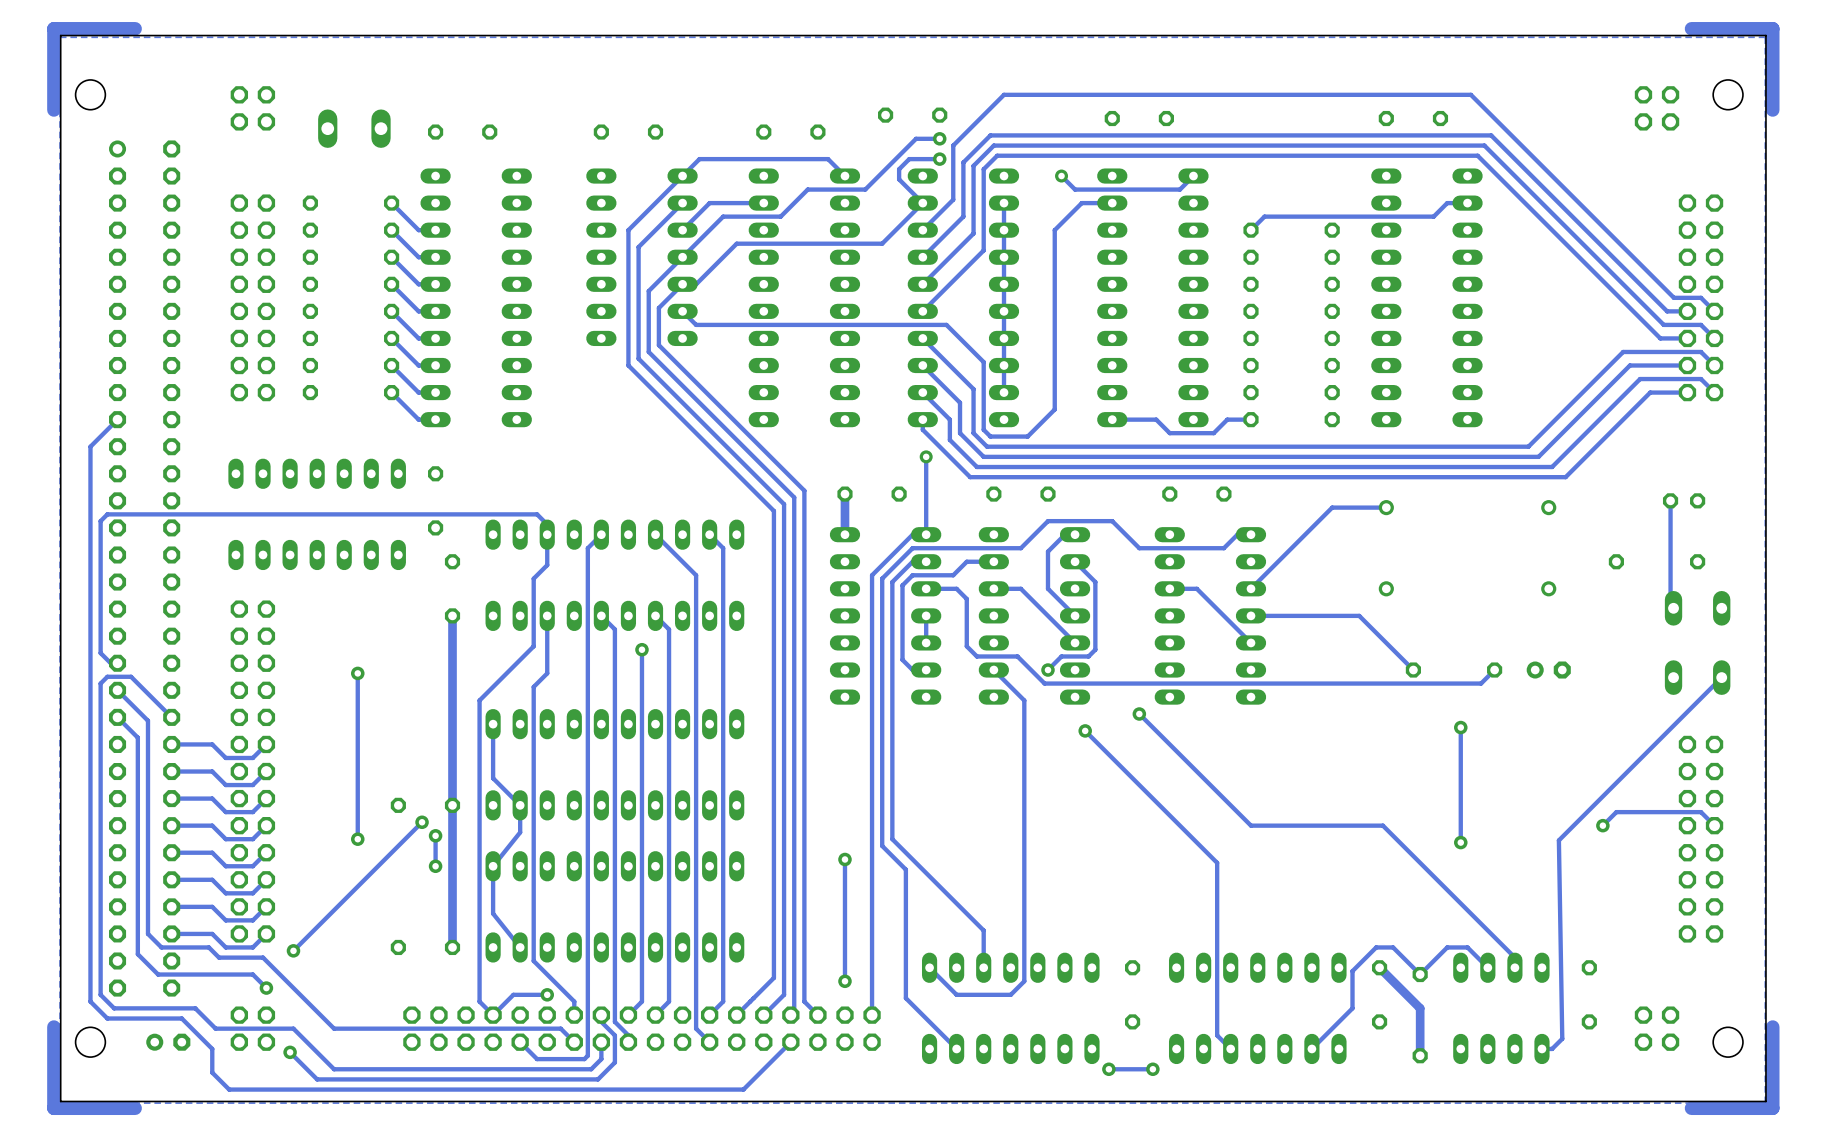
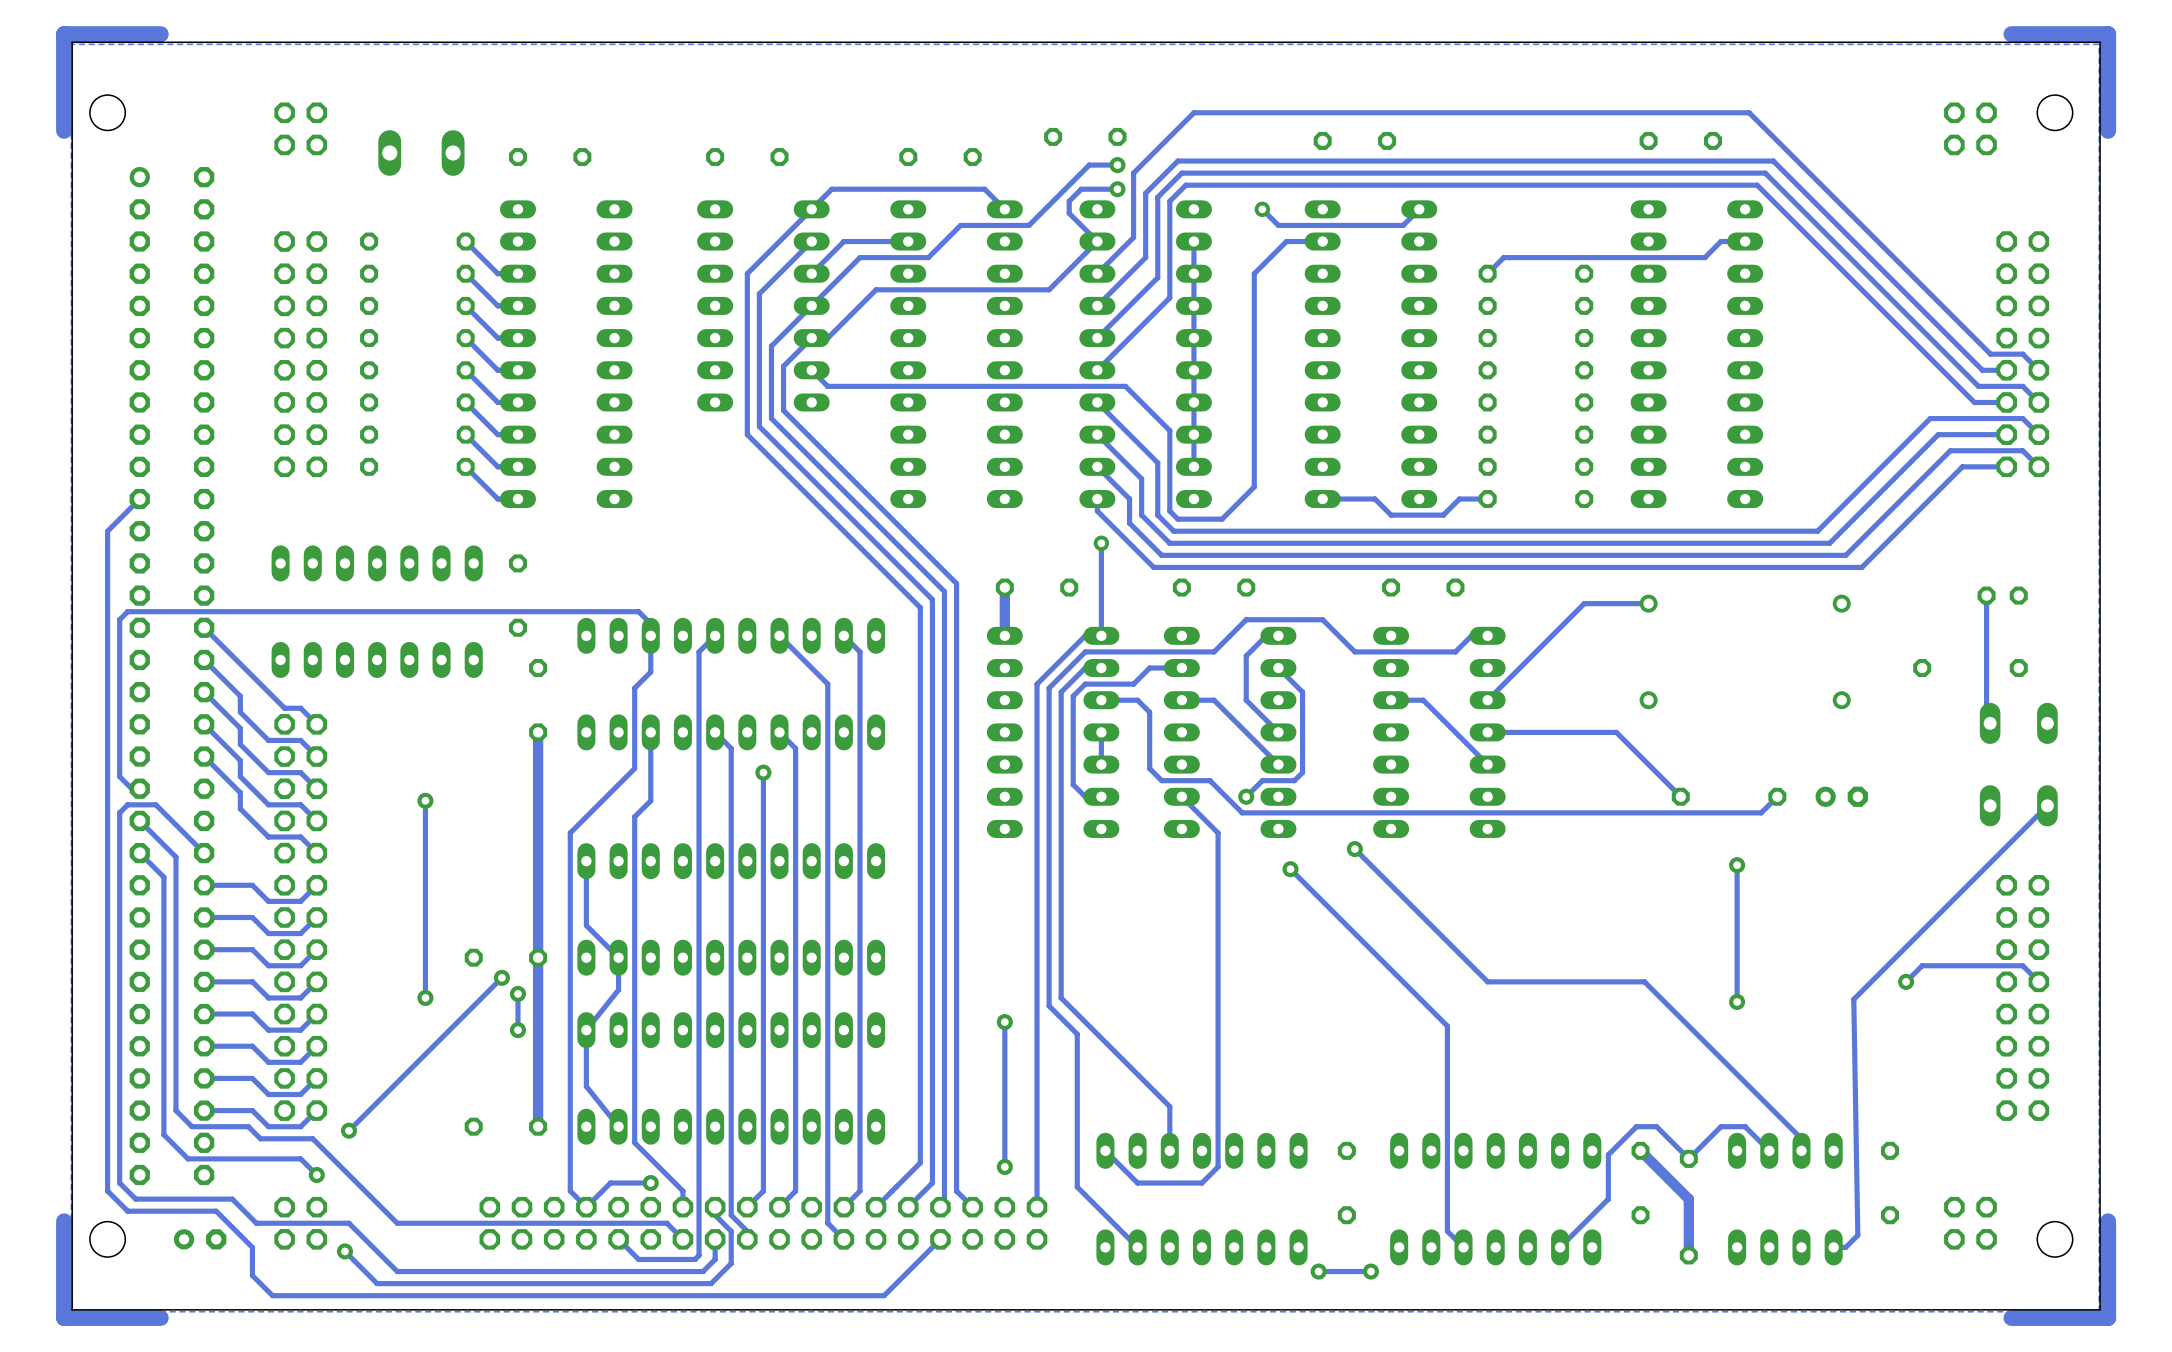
track: none -> (204, 627) (284, 708) (300, 708) (316, 724)
track: none -> (204, 659) (240, 696) (240, 712) (268, 740) (300, 740) (316, 756)
track: none -> (204, 692) (240, 728) (240, 744) (268, 772) (300, 772) (316, 788)
track: none -> (204, 724) (240, 760) (240, 776) (268, 804) (300, 804) (316, 820)
track: none -> (204, 756) (240, 792) (240, 808) (268, 837) (300, 837) (316, 853)

